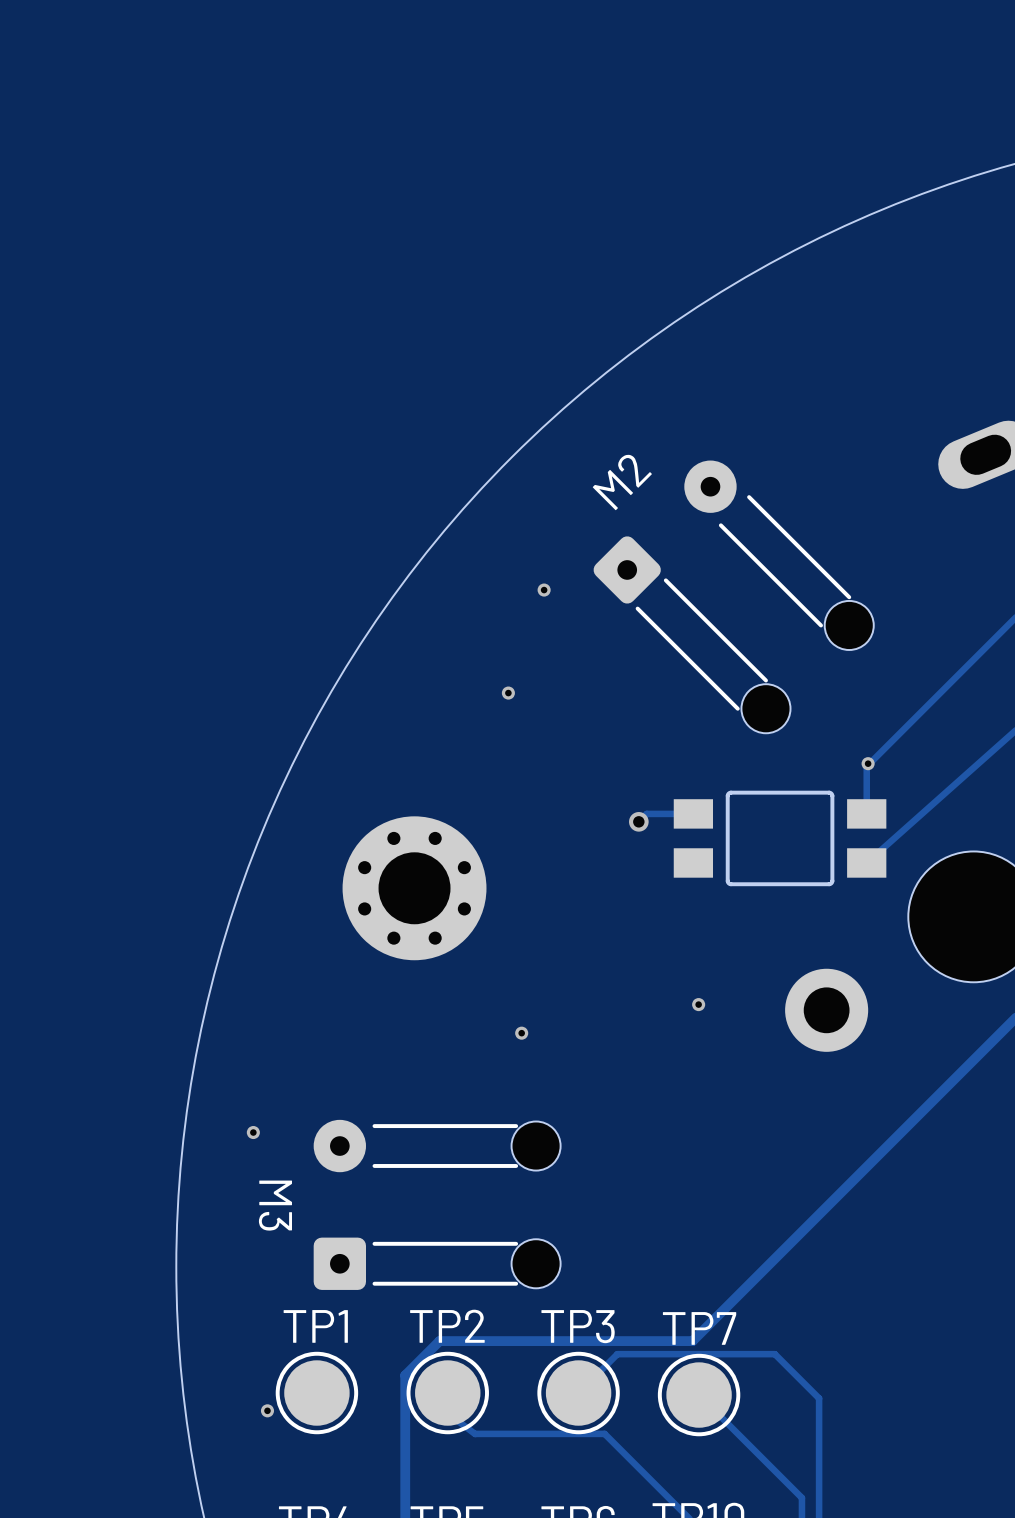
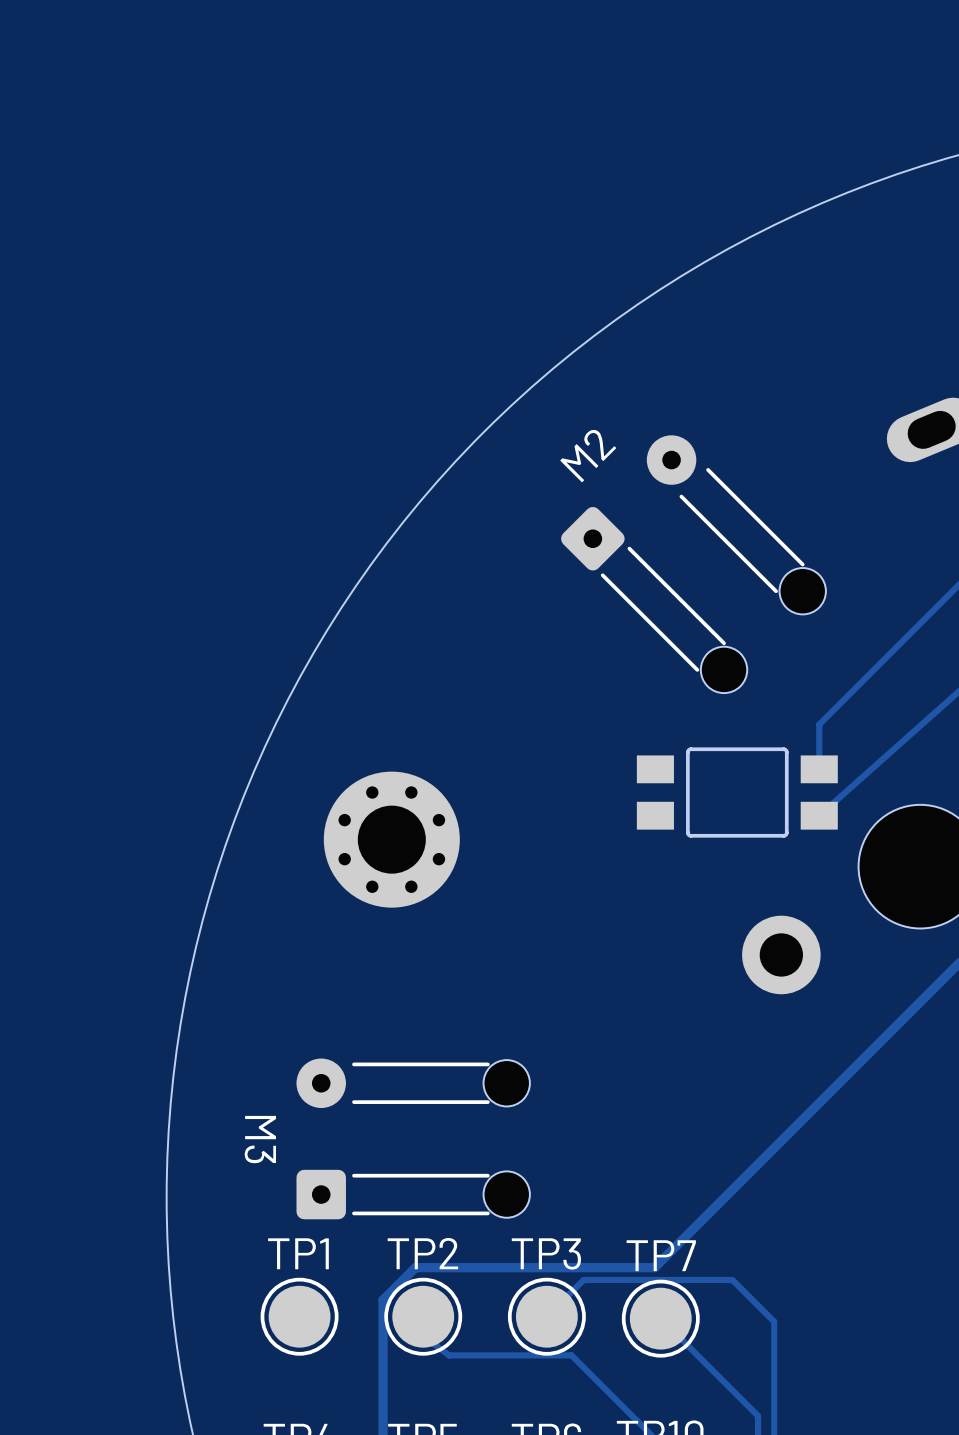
via: (544, 590) -> none
via: (508, 693) -> none
via: (868, 763) -> none
track: (693, 813) (646, 813) (638, 821) -> none
via: (638, 821) -> none
via: (698, 1004) -> none
via: (521, 1033) -> none
via: (253, 1132) -> none
via: (267, 1410) -> none

